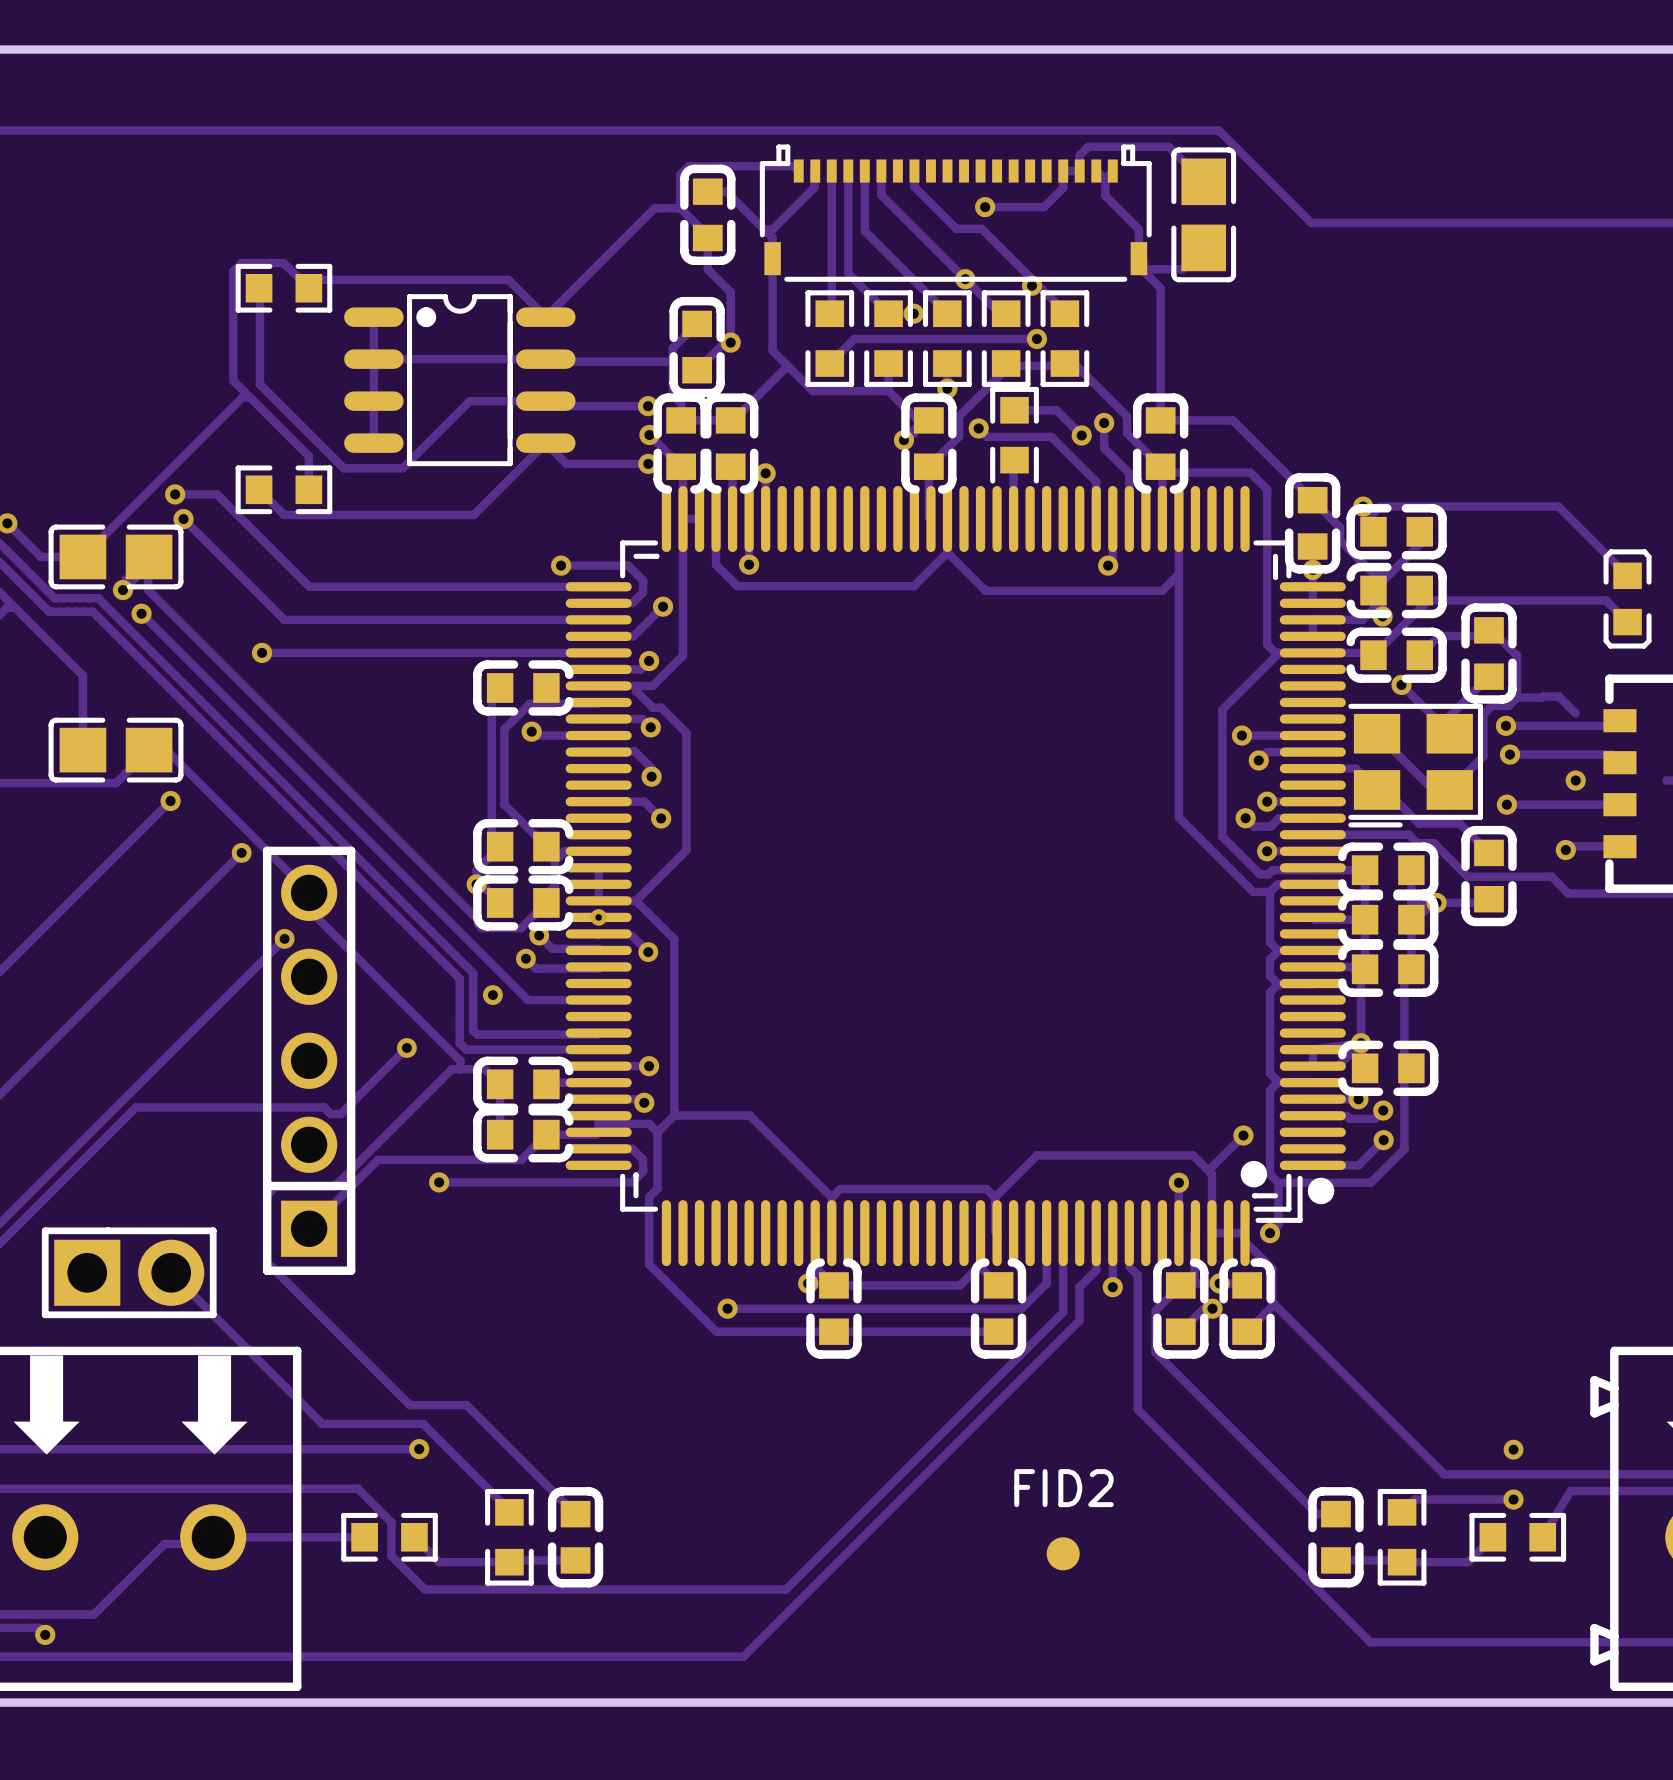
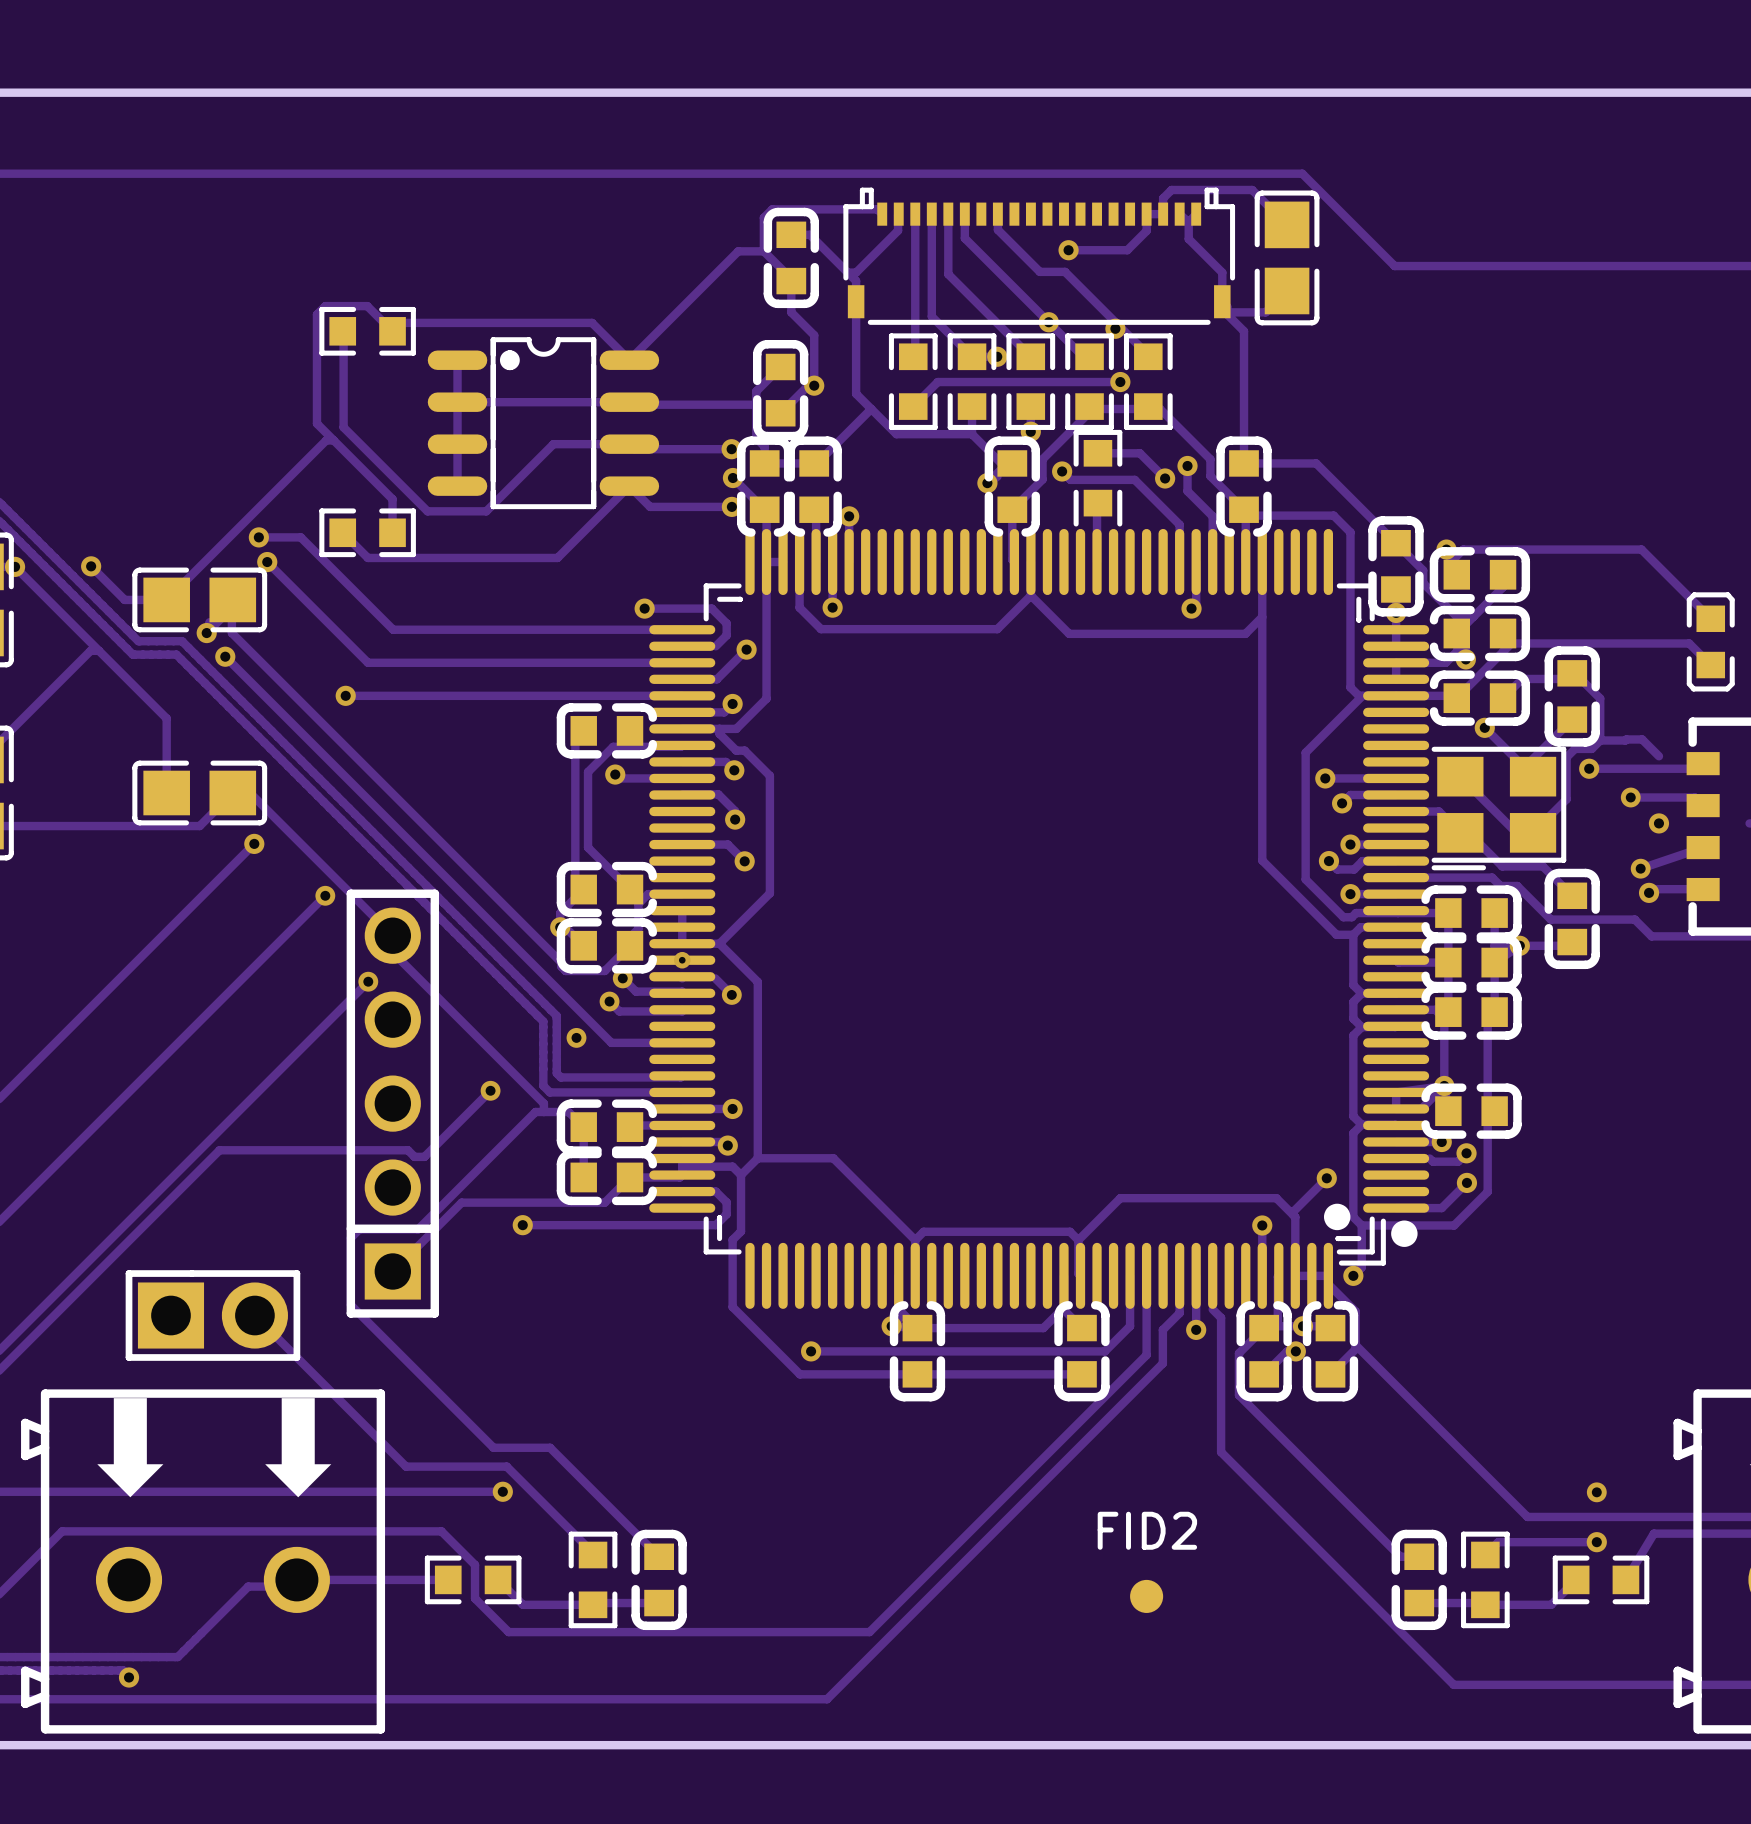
track: (1509, 754) (1547, 754) -> none
via: (1509, 754) -> none
via: none -> (1630, 797)
track: (1506, 804) (1619, 804) -> (1640, 868) (1703, 847)
via: (1506, 804) -> none
via: none -> (1640, 868)

